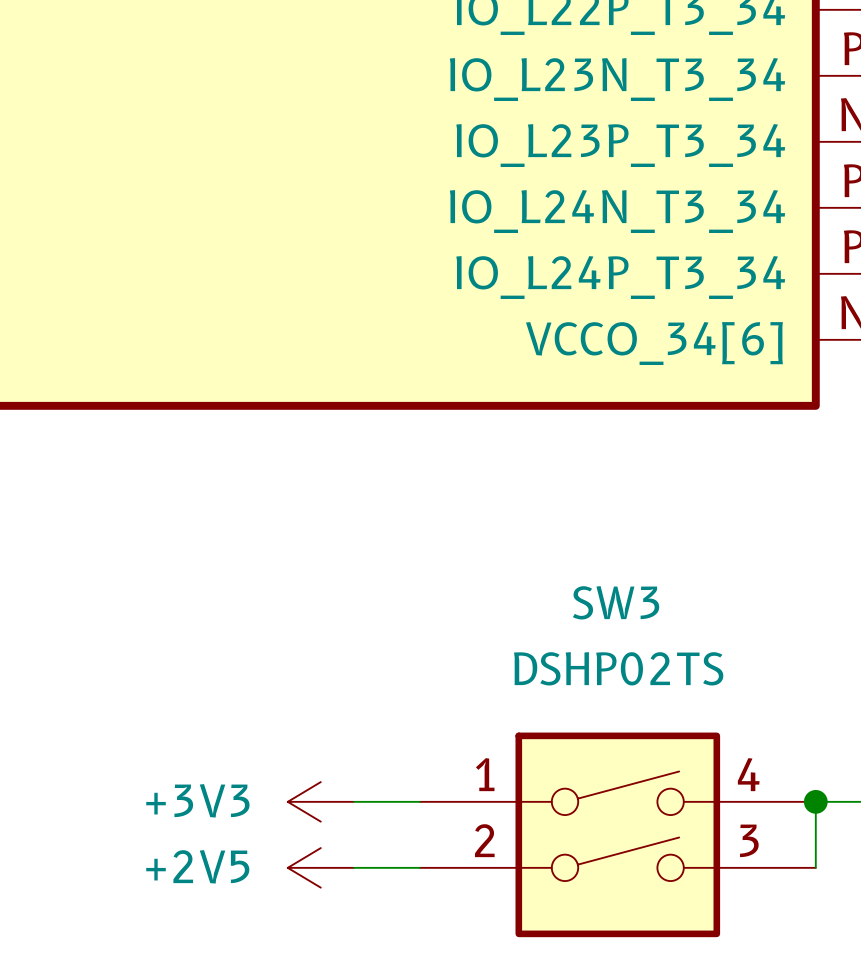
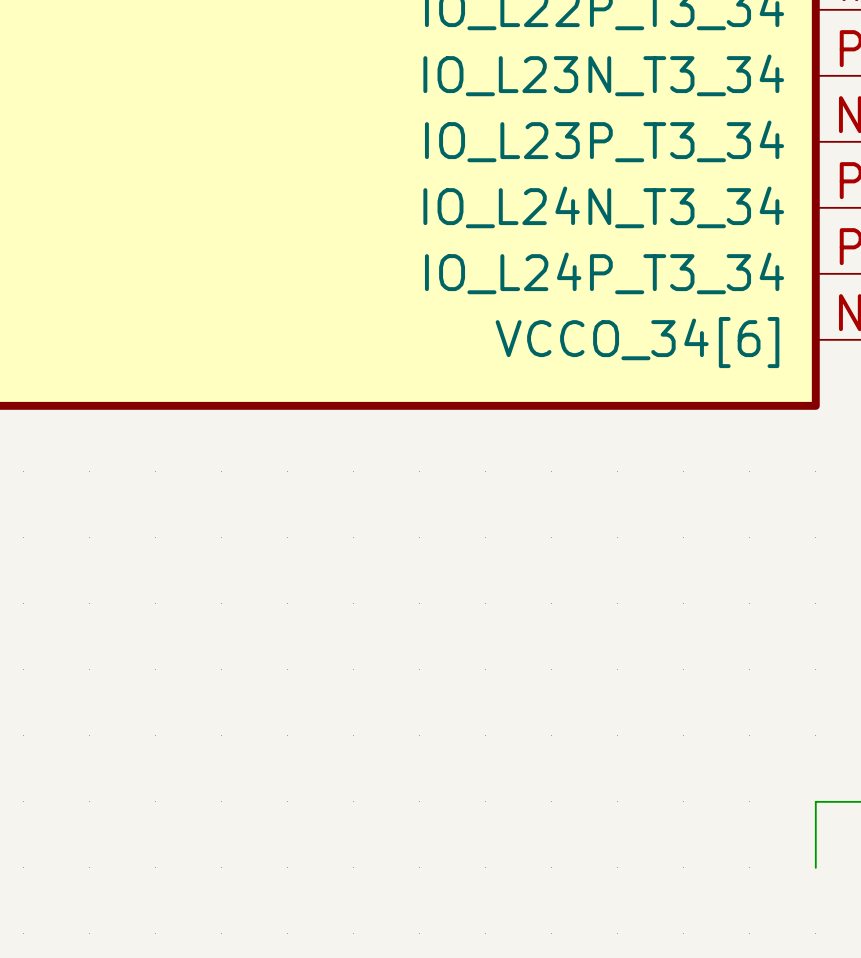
power symbol: +3V3 (320, 801) -> none
wire: (353, 801) (419, 801) -> none
junction: (815, 801) -> none
SW3: DSHP02TS (617, 834) -> none
power symbol: +2V5 (320, 867) -> none
wire: (353, 867) (419, 867) -> none

